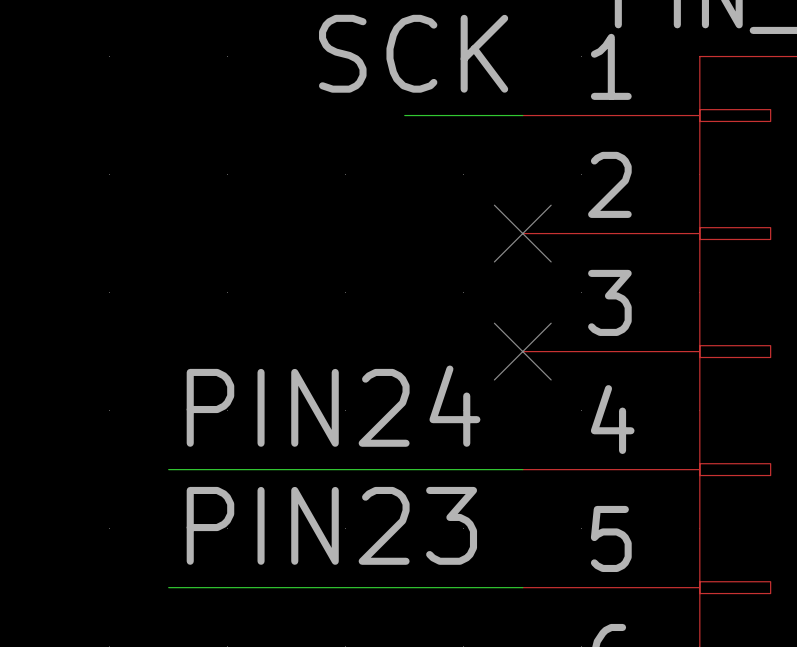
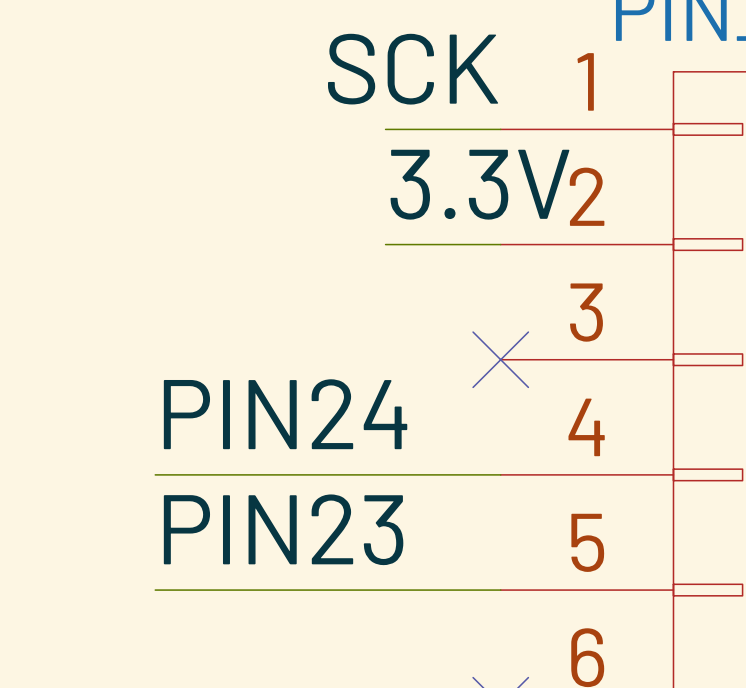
label: none -> 3.3V (480, 184)
wire: none -> (385, 244) (500, 244)
no-connect mark: (522, 233) -> none

